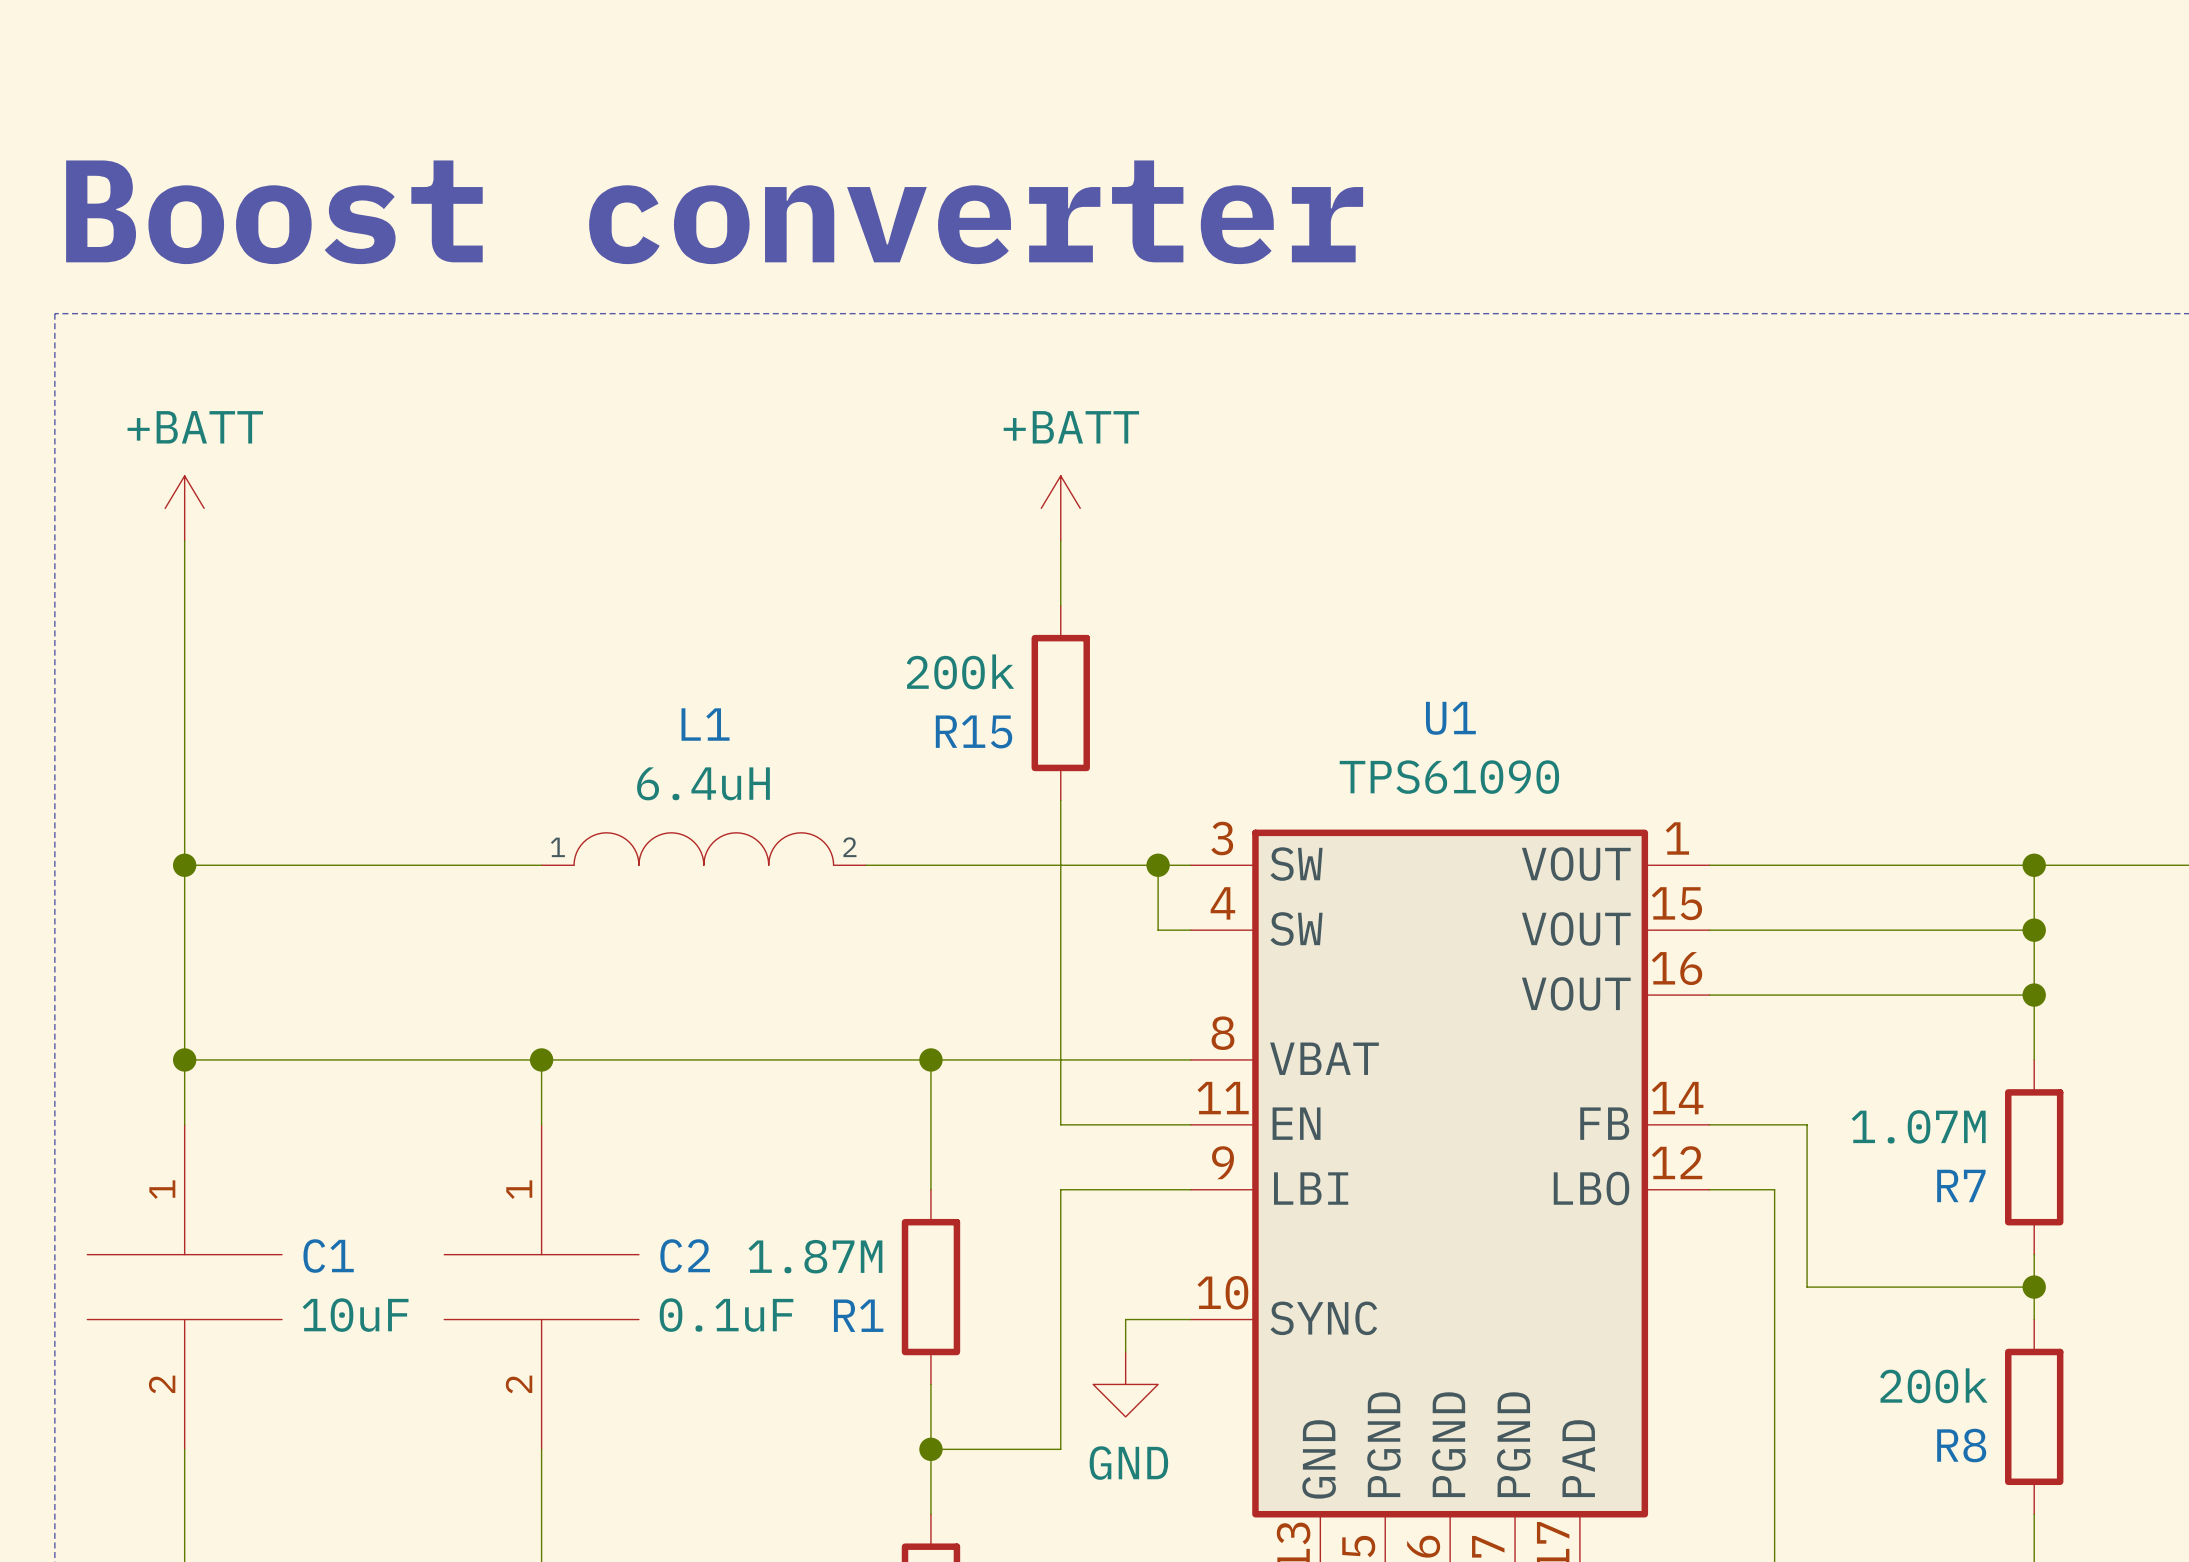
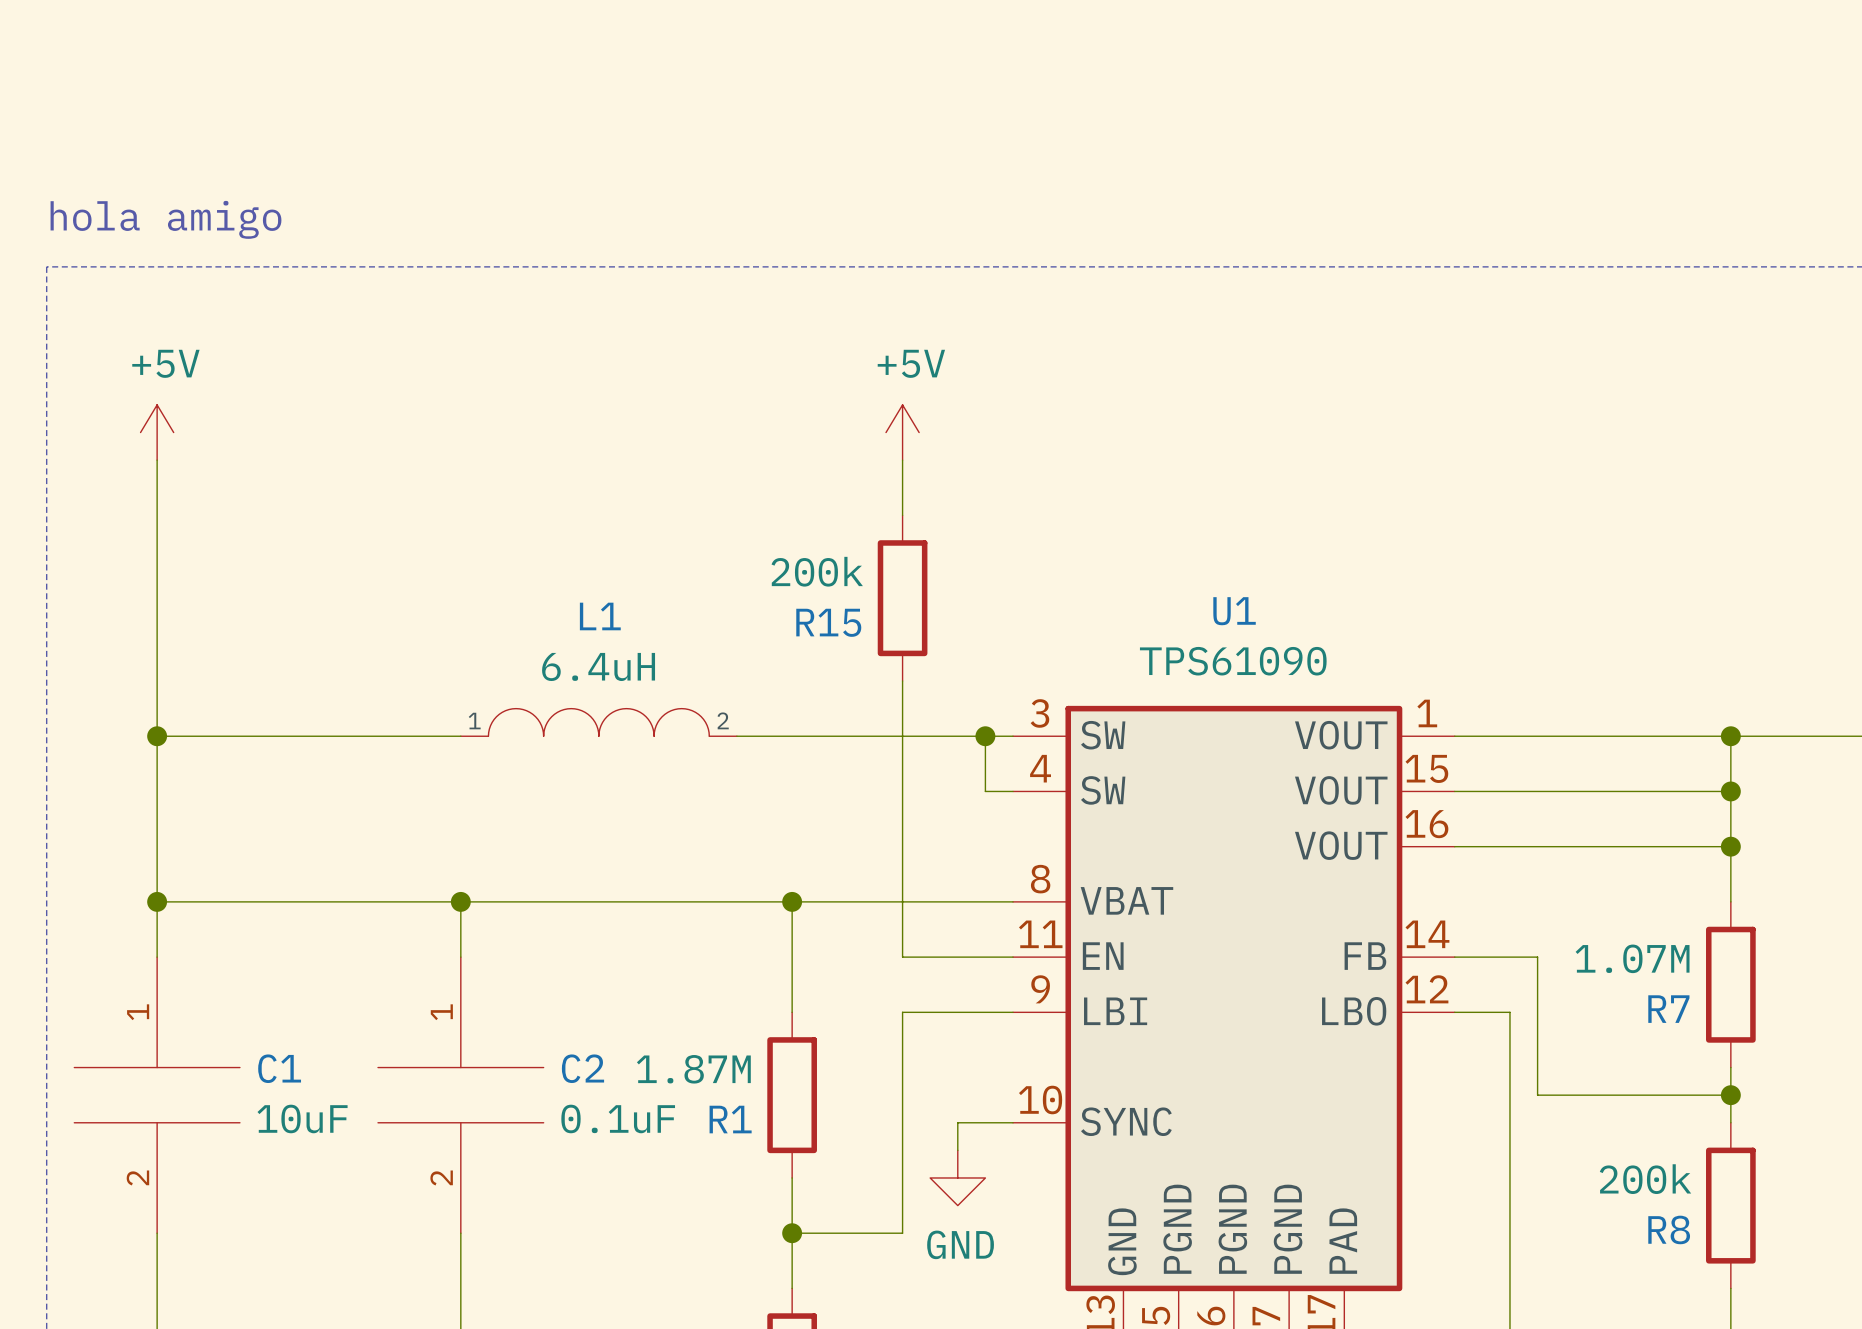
text: Boost converter (714, 212) -> hola amigo (165, 219)
power symbol: +BATT (184, 508) -> +5V (157, 432)
power symbol: +BATT (1060, 508) -> +5V (902, 432)

